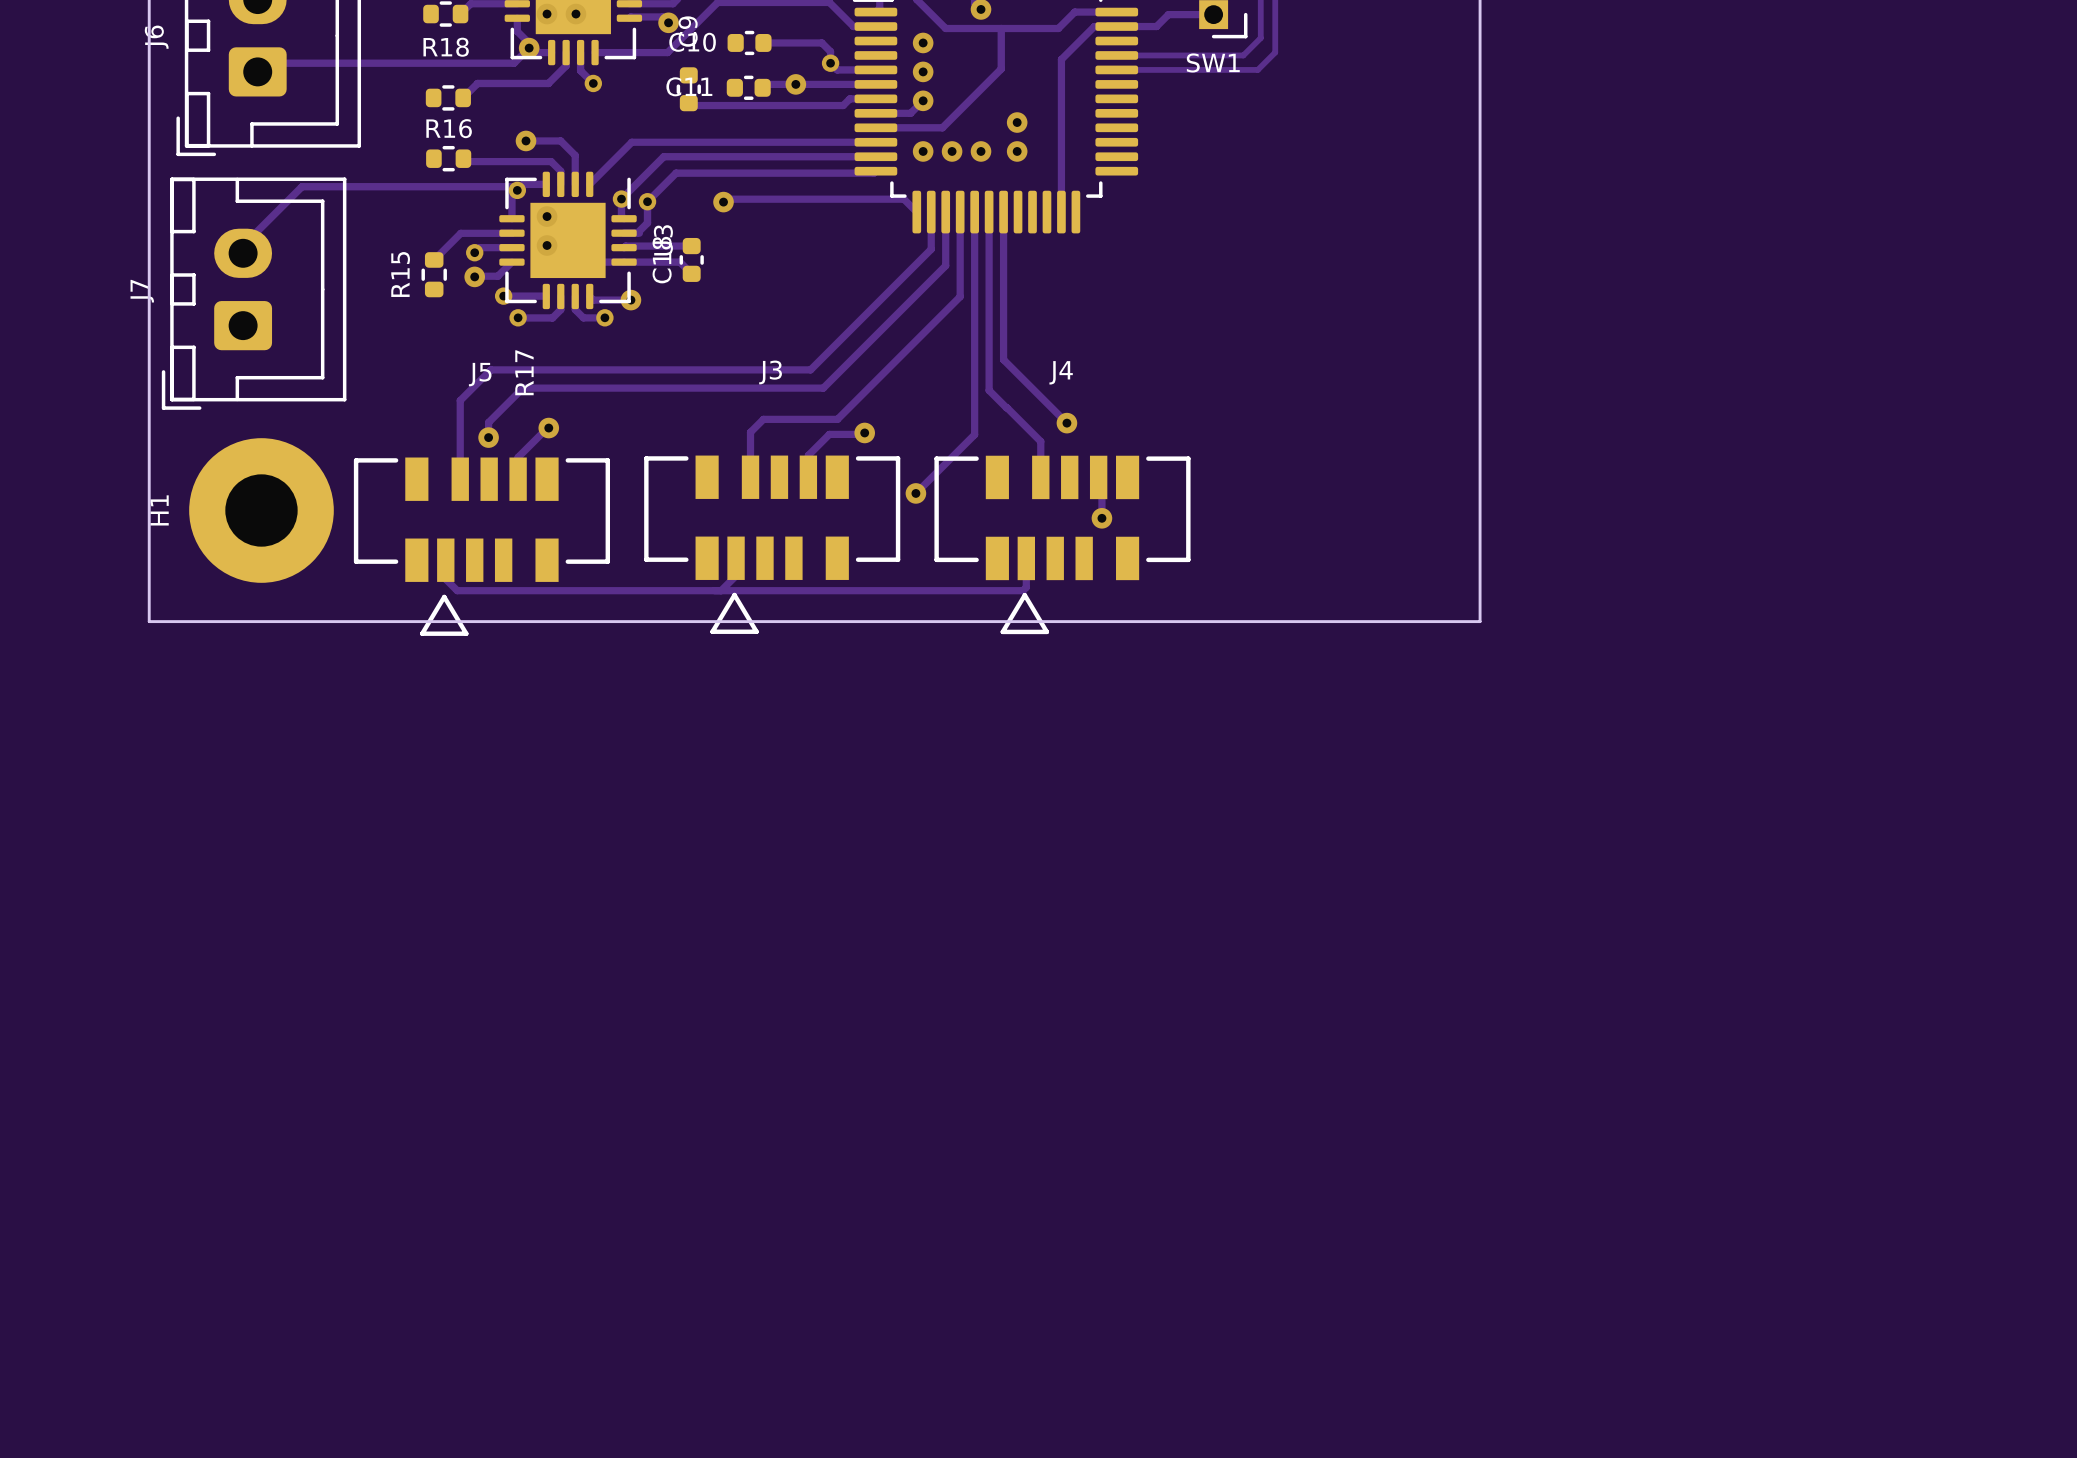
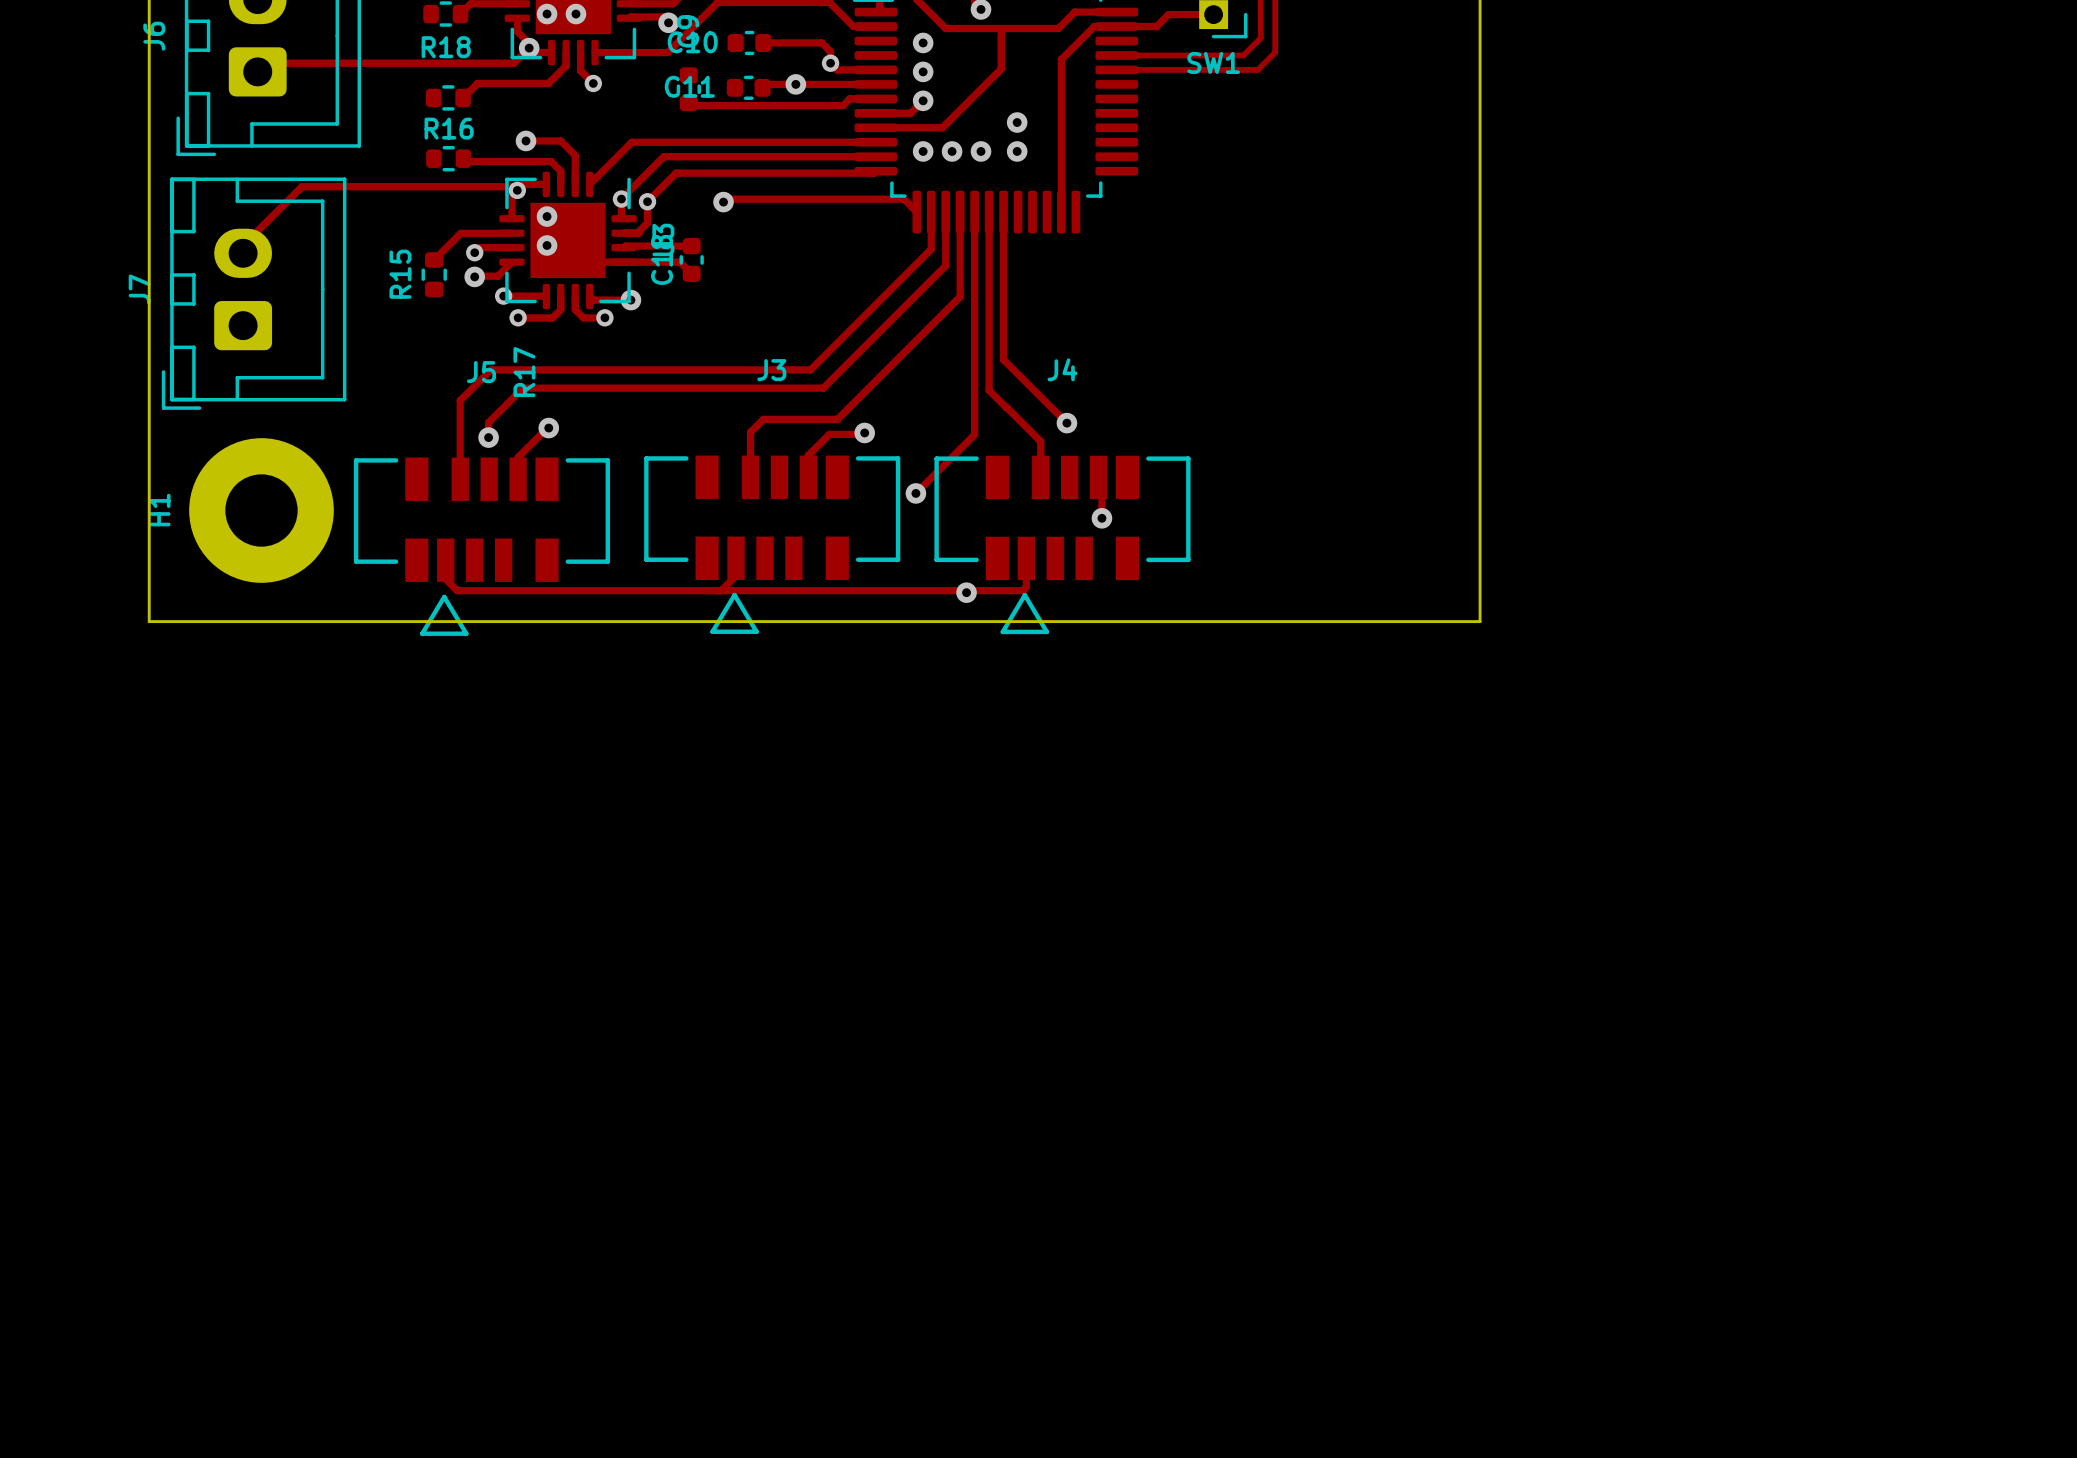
via: none -> (966, 592)

